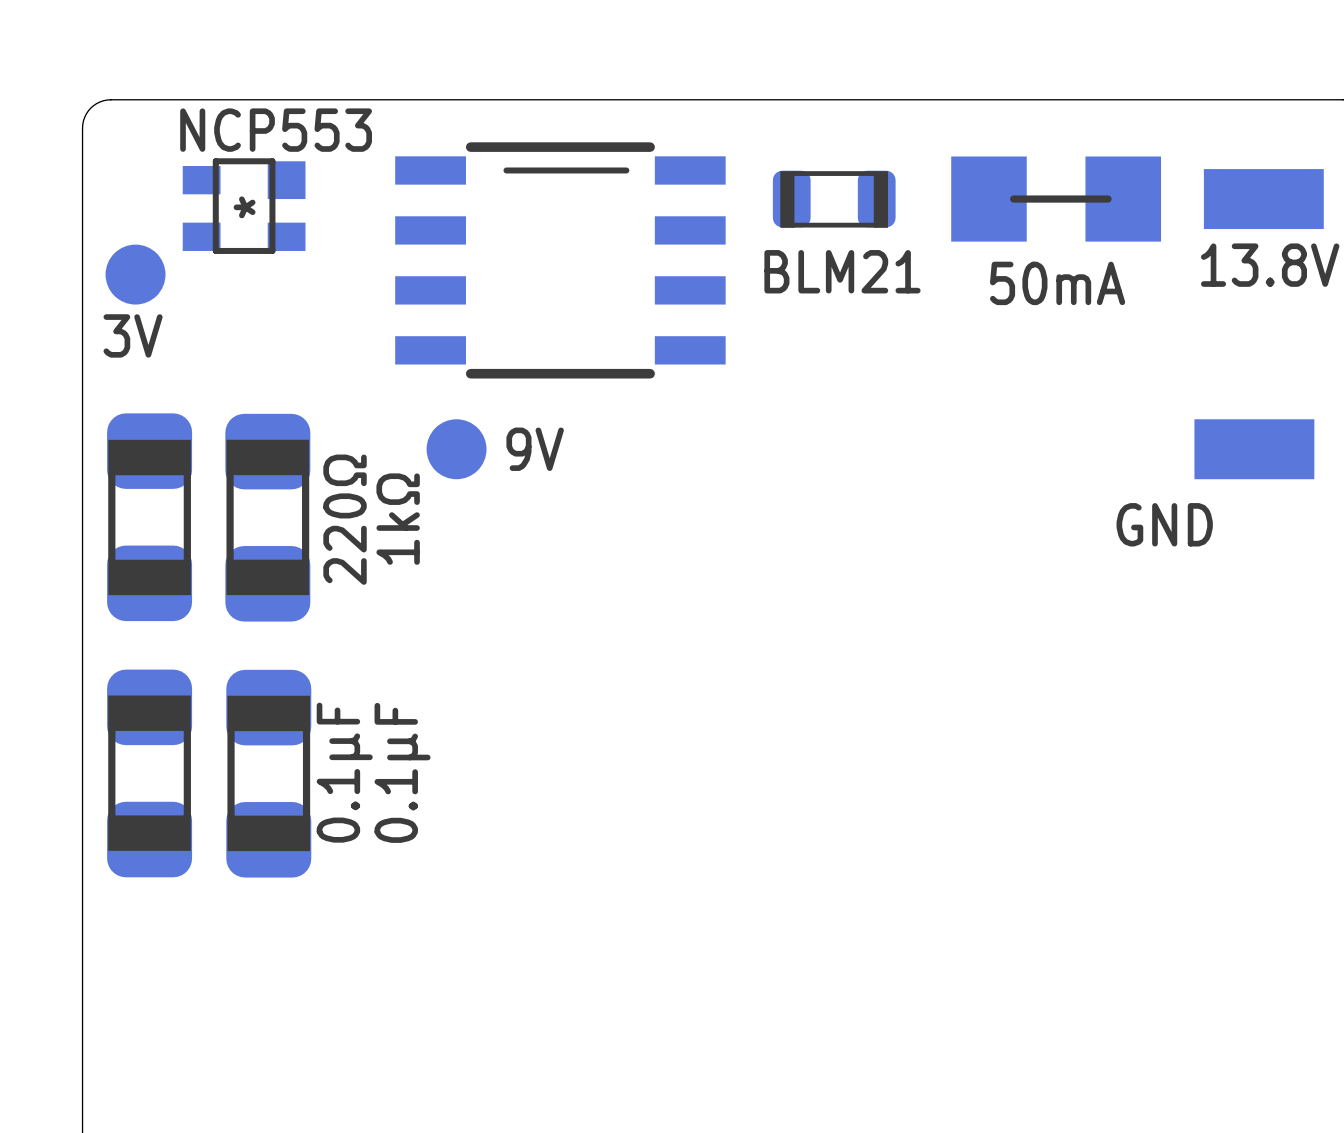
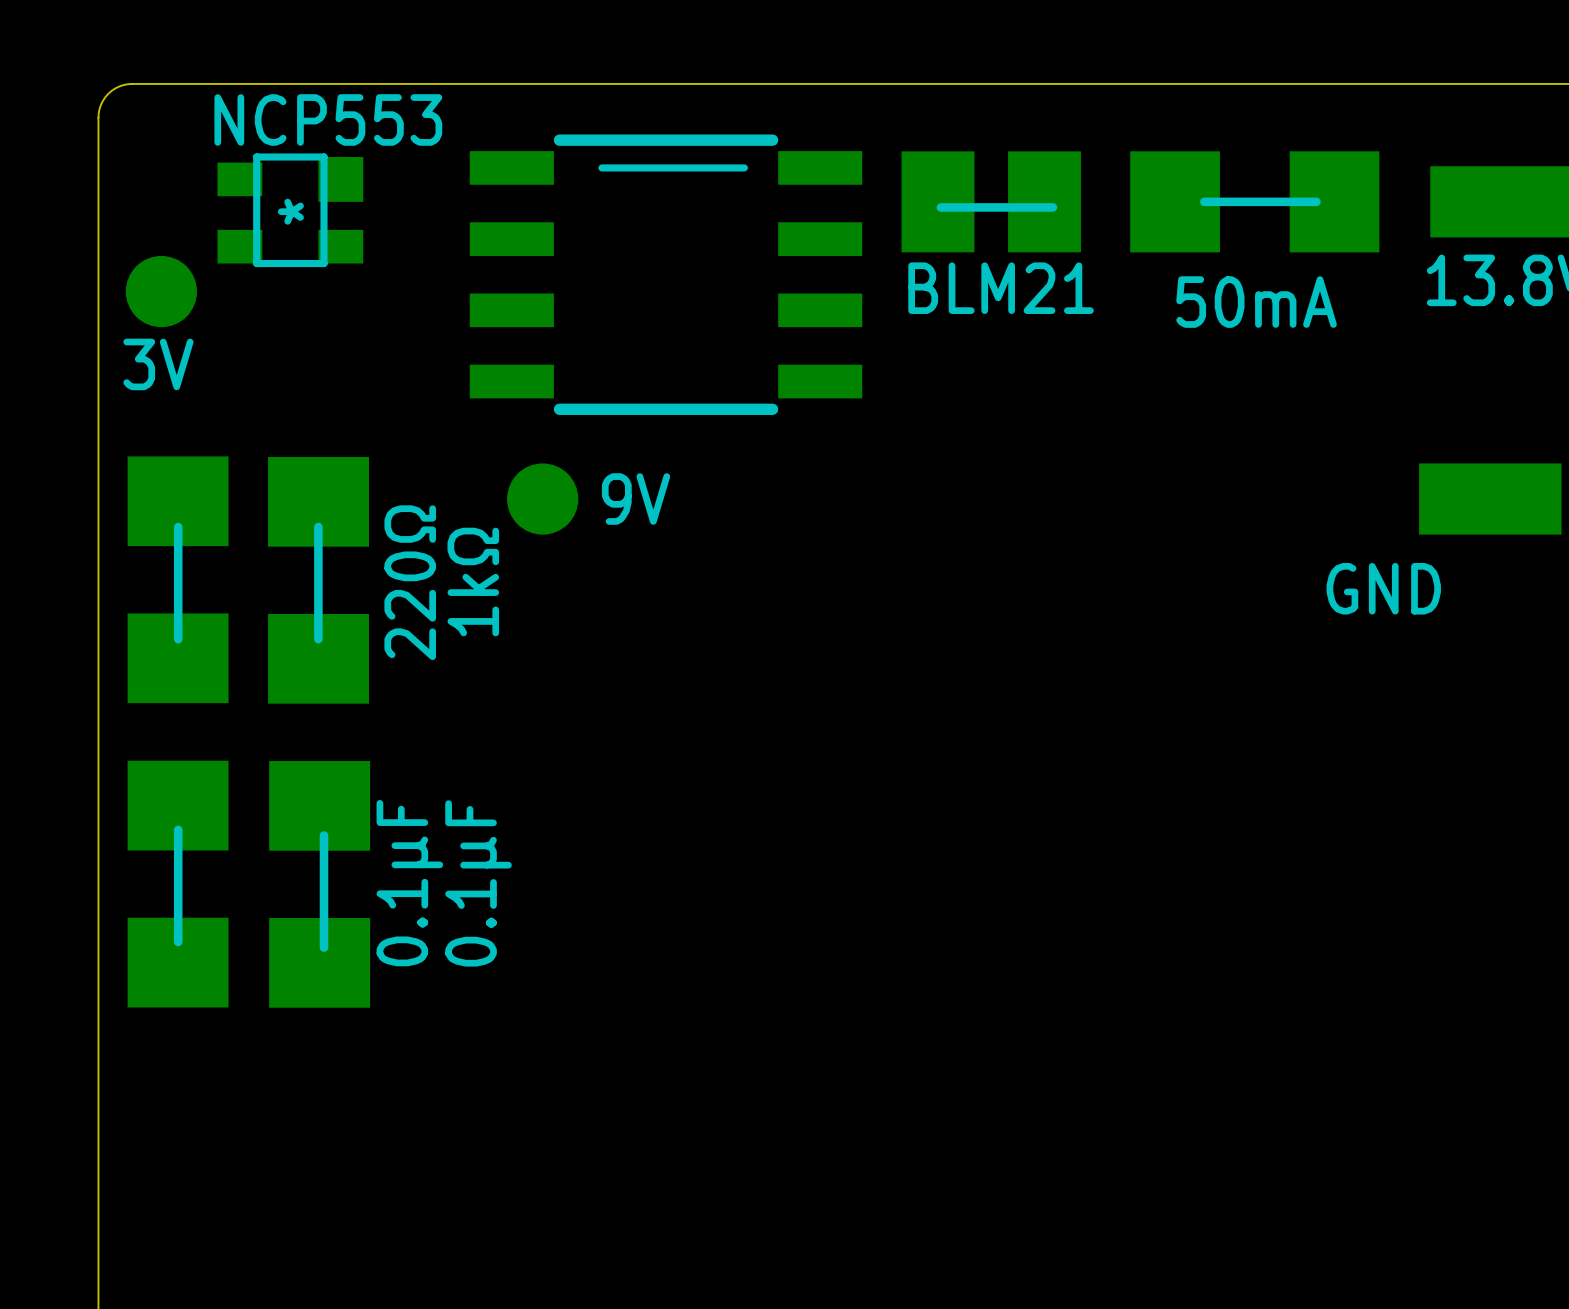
part footprint: [772, 170, 896, 228] -> [901, 151, 1081, 253]
line: none -> (1052, 207) (940, 207)
part footprint: [107, 413, 193, 622] -> [127, 456, 229, 704]
part footprint: [225, 413, 311, 622] -> [268, 456, 370, 704]
line: none -> (178, 527) (178, 639)
line: none -> (318, 527) (318, 639)
part footprint: [107, 669, 193, 878] -> [127, 760, 229, 1008]
part footprint: [226, 669, 312, 878] -> [269, 761, 371, 1008]
line: none -> (178, 829) (178, 941)
line: none -> (324, 835) (324, 947)

